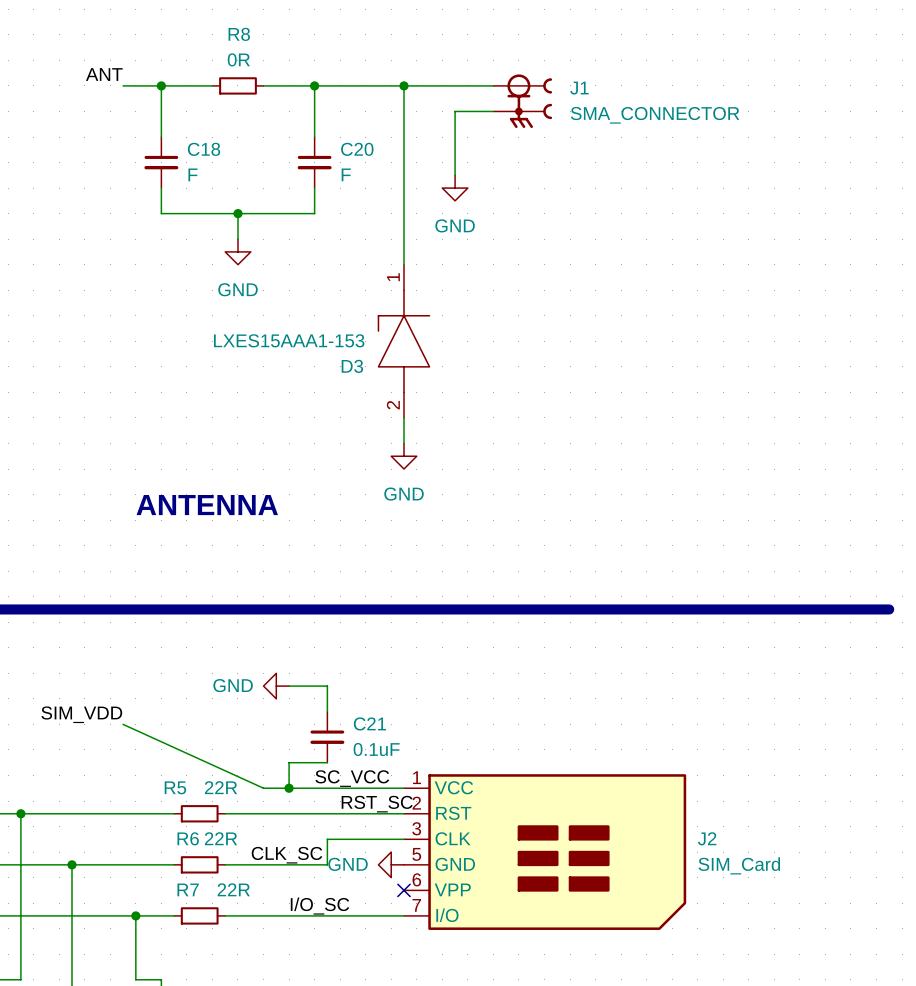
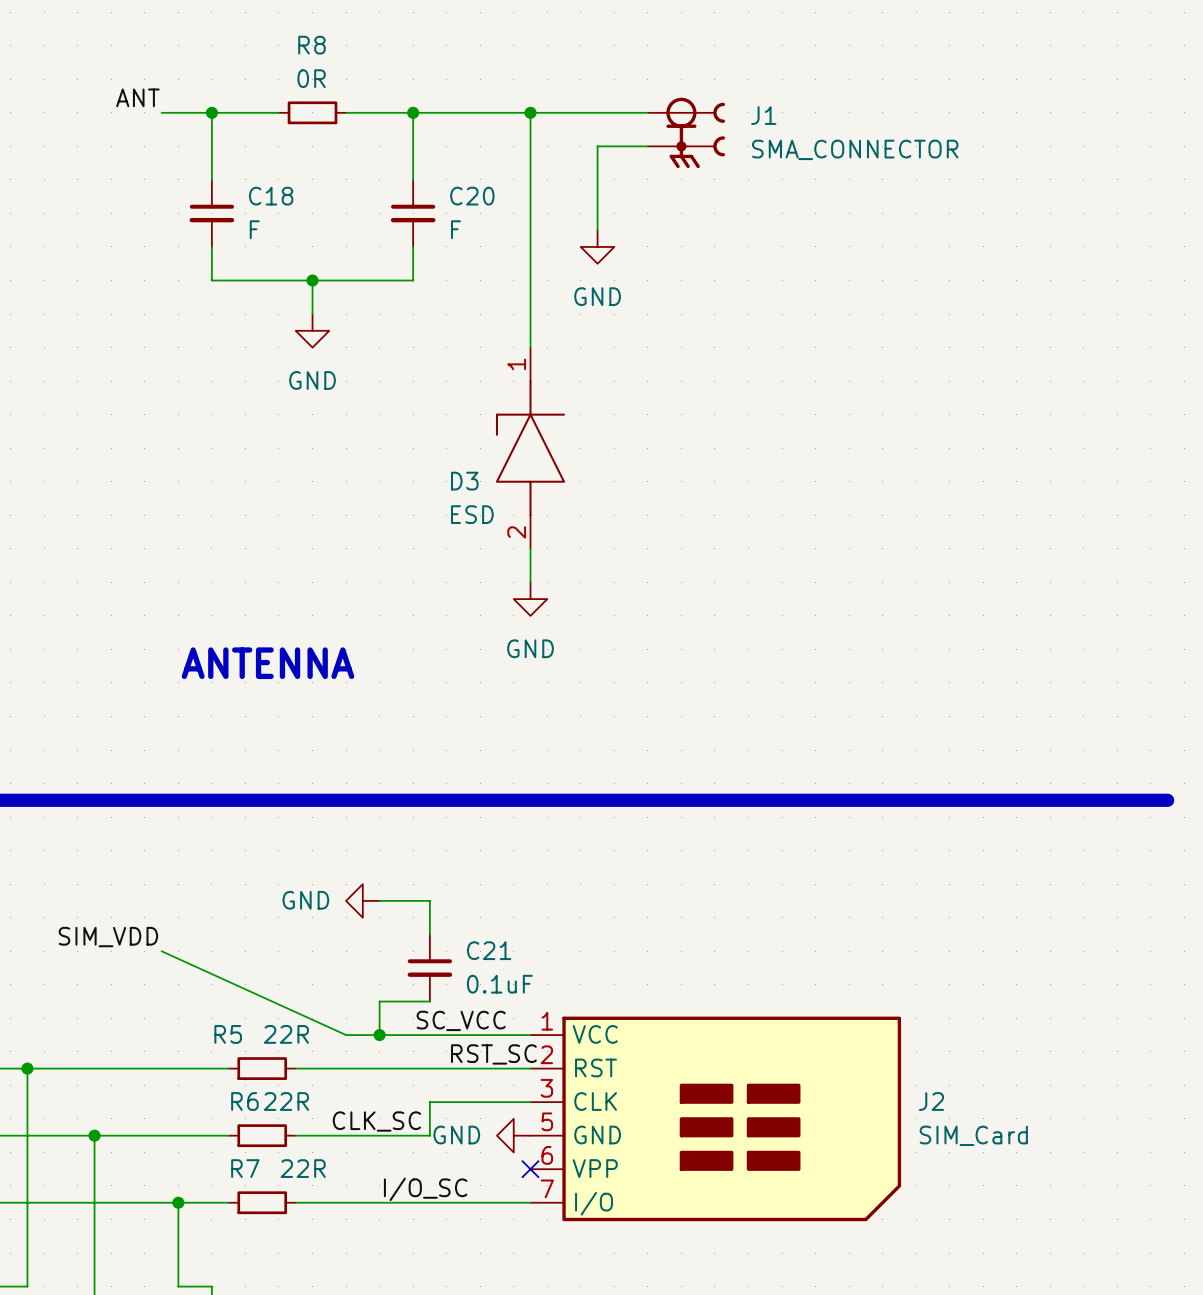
D3 value: LXES15AAA1-153 (289, 340) -> ESD (472, 514)

